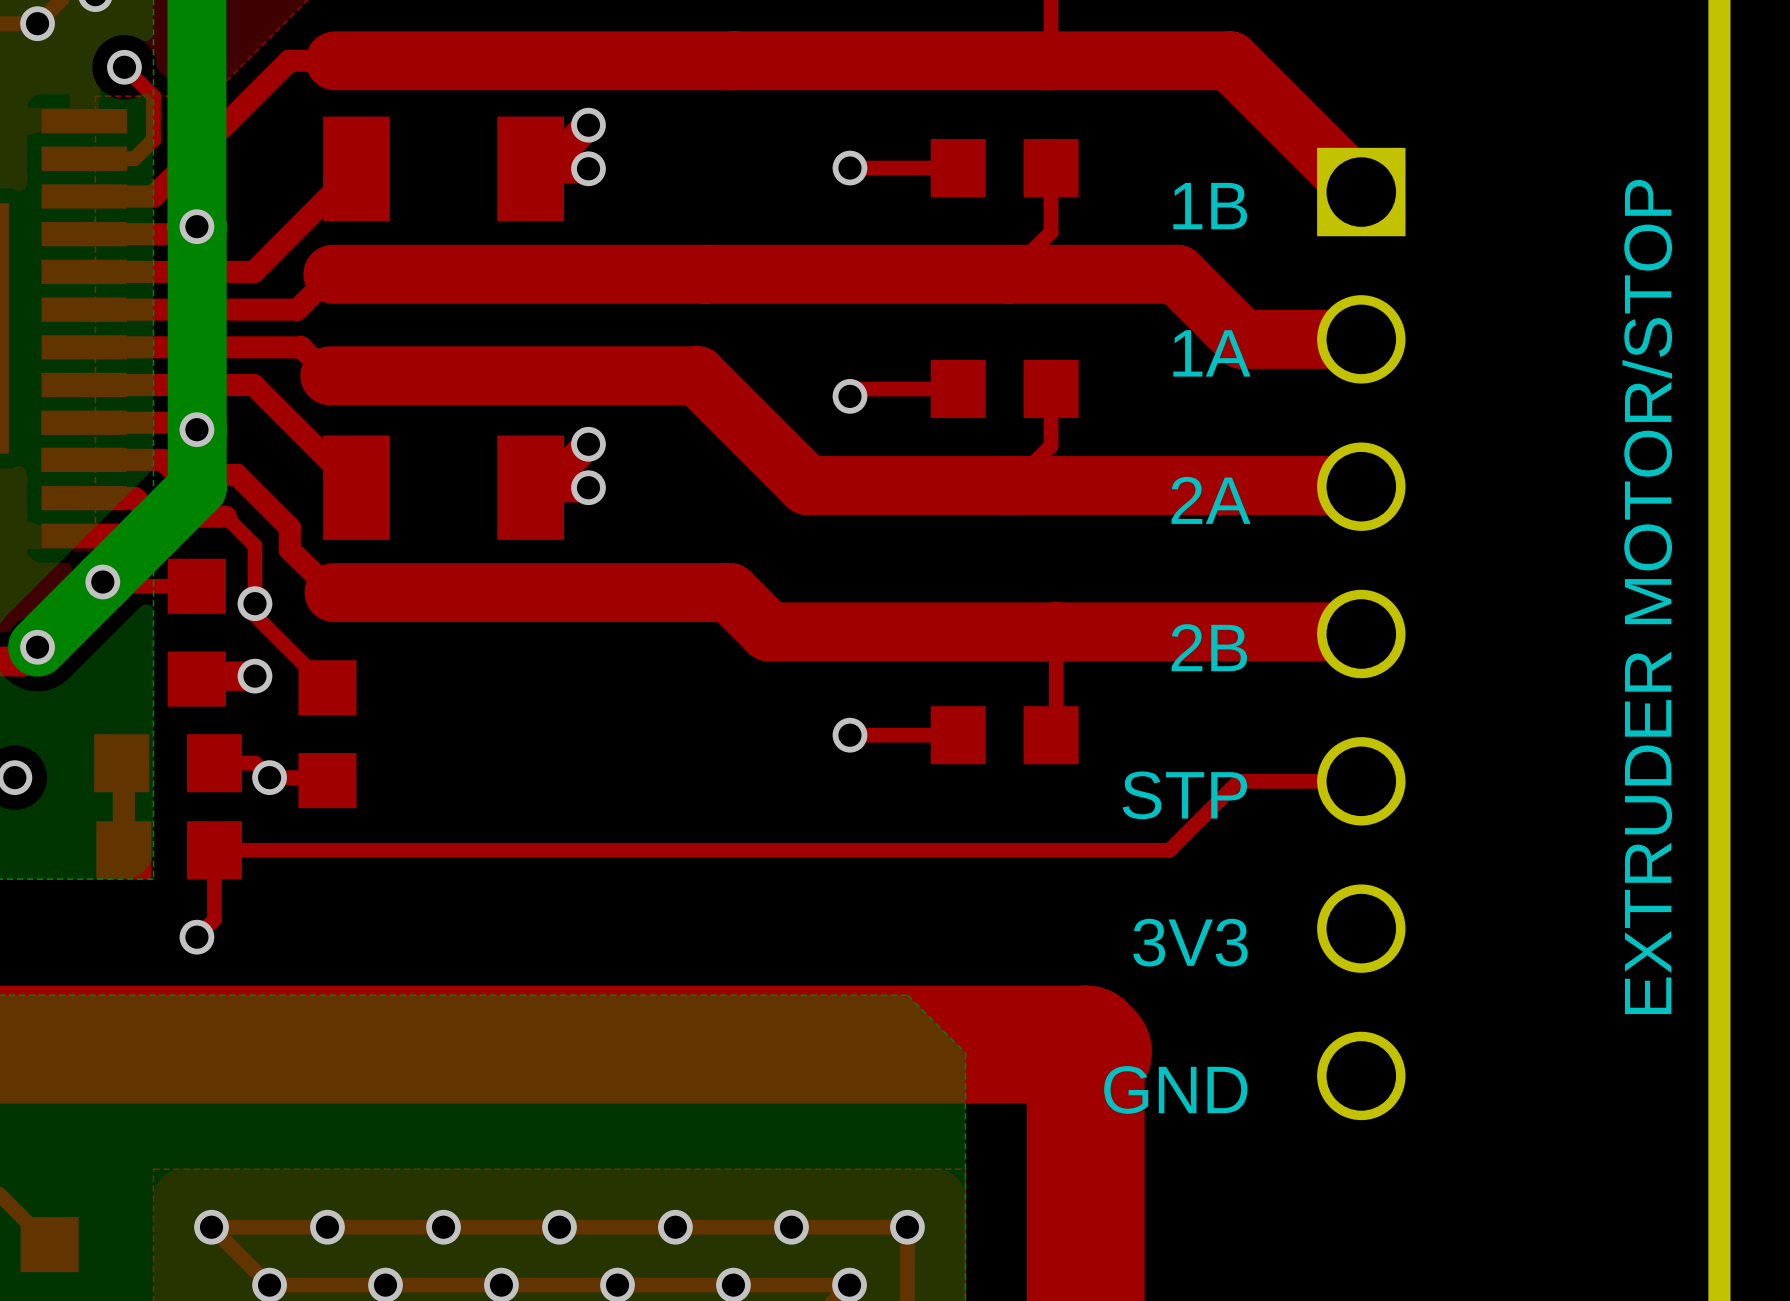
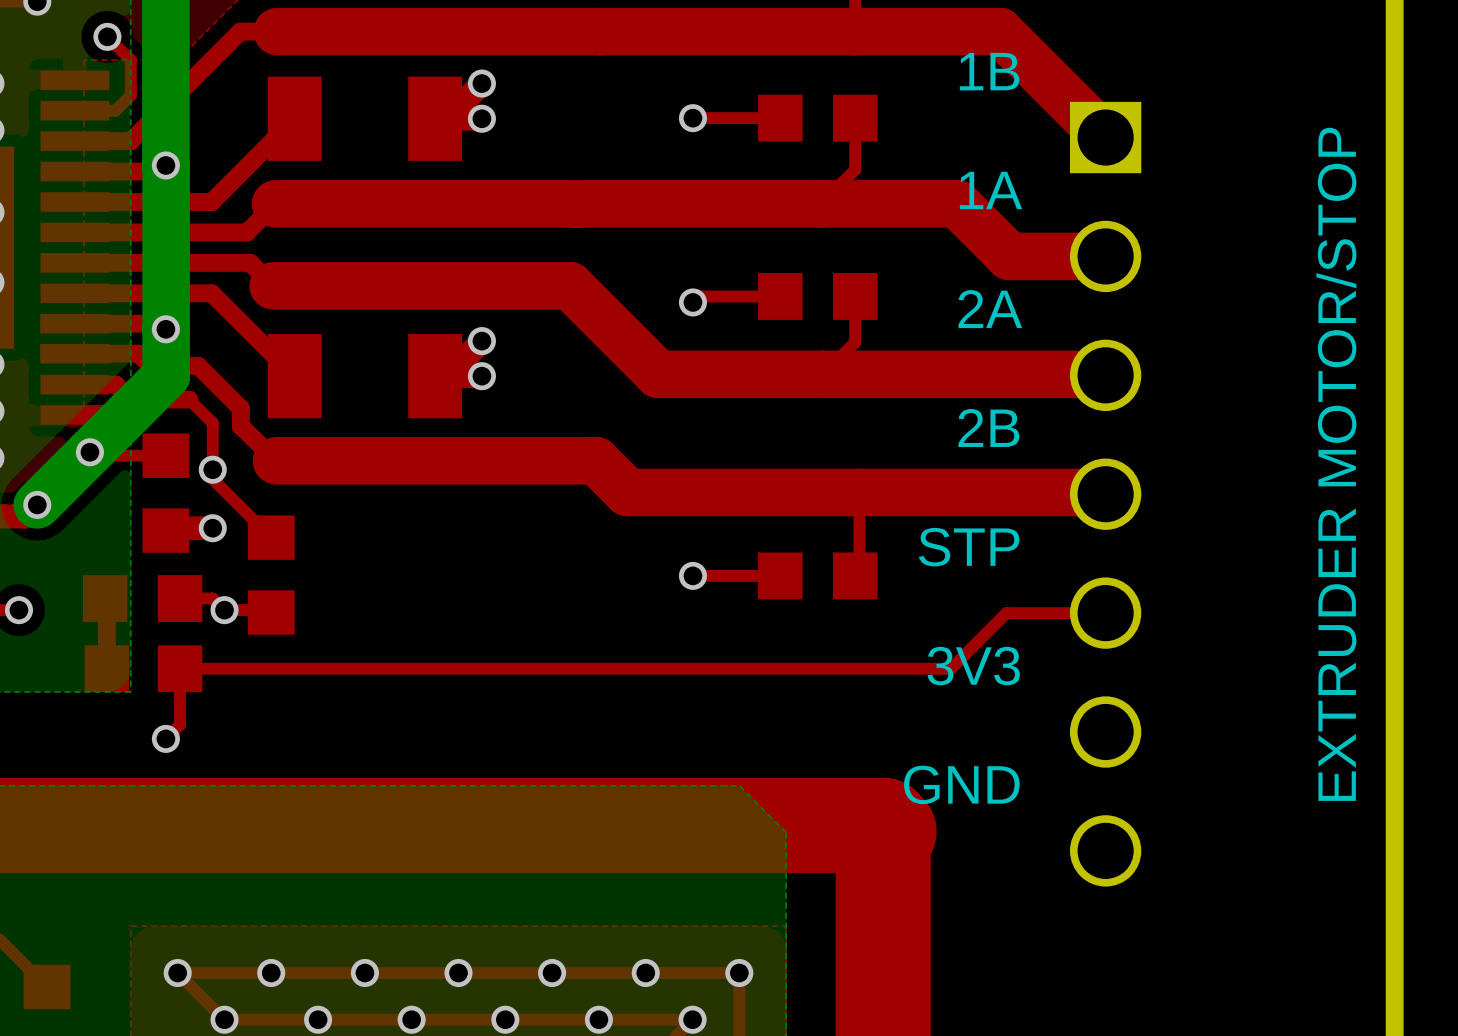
text position: 1B (1210, 206) -> 1B (989, 71)
text position: 1A (1211, 353) -> 1A (991, 190)
text position: 2A (1211, 500) -> 2A (990, 309)
text position: 2B (1209, 647) -> 2B (988, 427)
text position: STP (1184, 795) -> STP (969, 547)
text position: 3V3 (1190, 942) -> 3V3 (973, 666)
text position: GND (1175, 1089) -> GND (961, 784)

